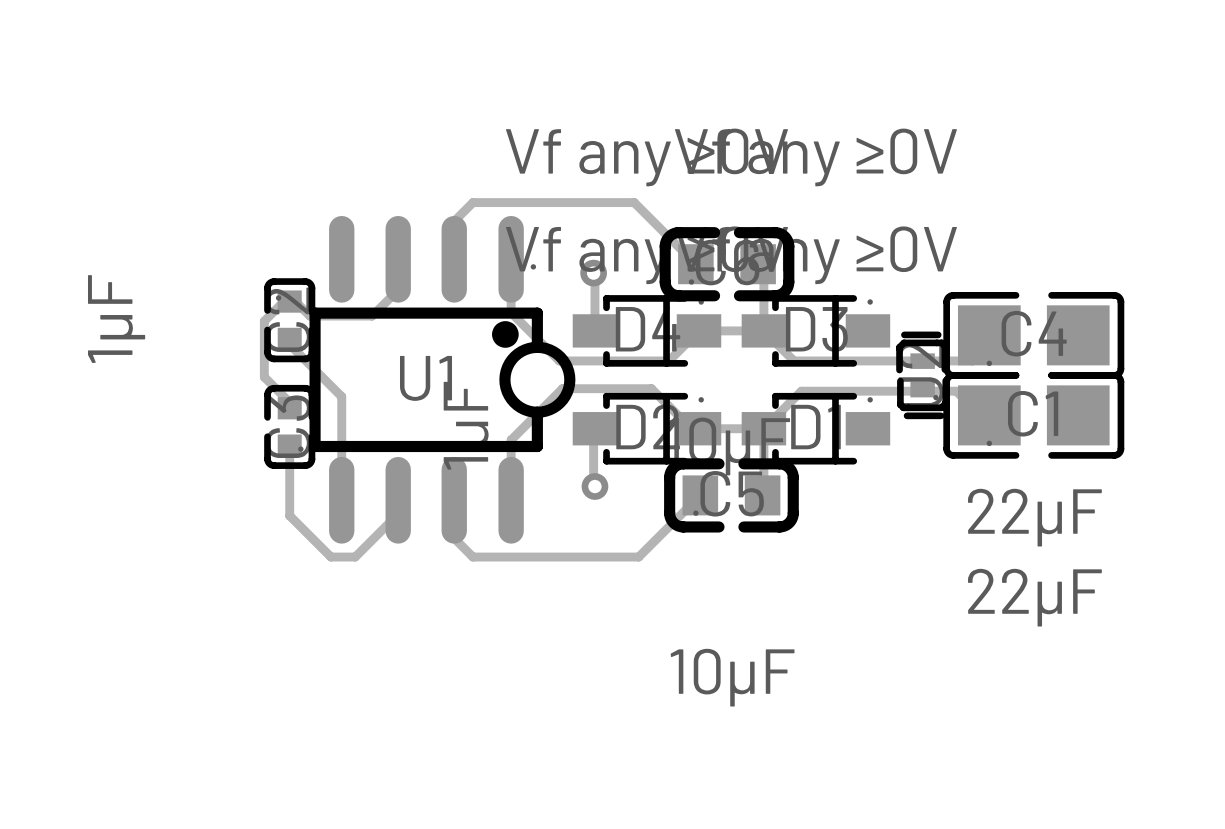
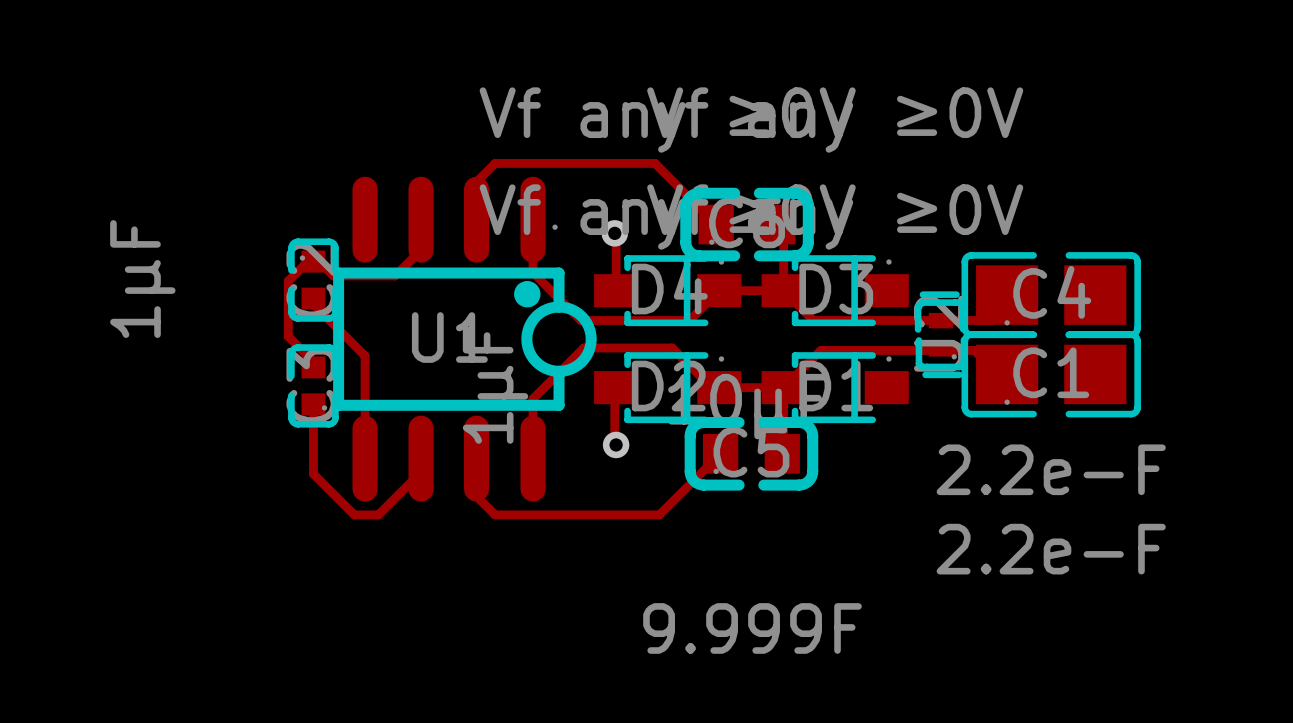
C4 value: 22µF (1034, 517) -> 2.2e-F (1051, 469)
C1 value: 22µF (1034, 597) -> 2.2e-F (1051, 549)
C5 value: 10µF (732, 677) -> 9.999F (752, 628)

